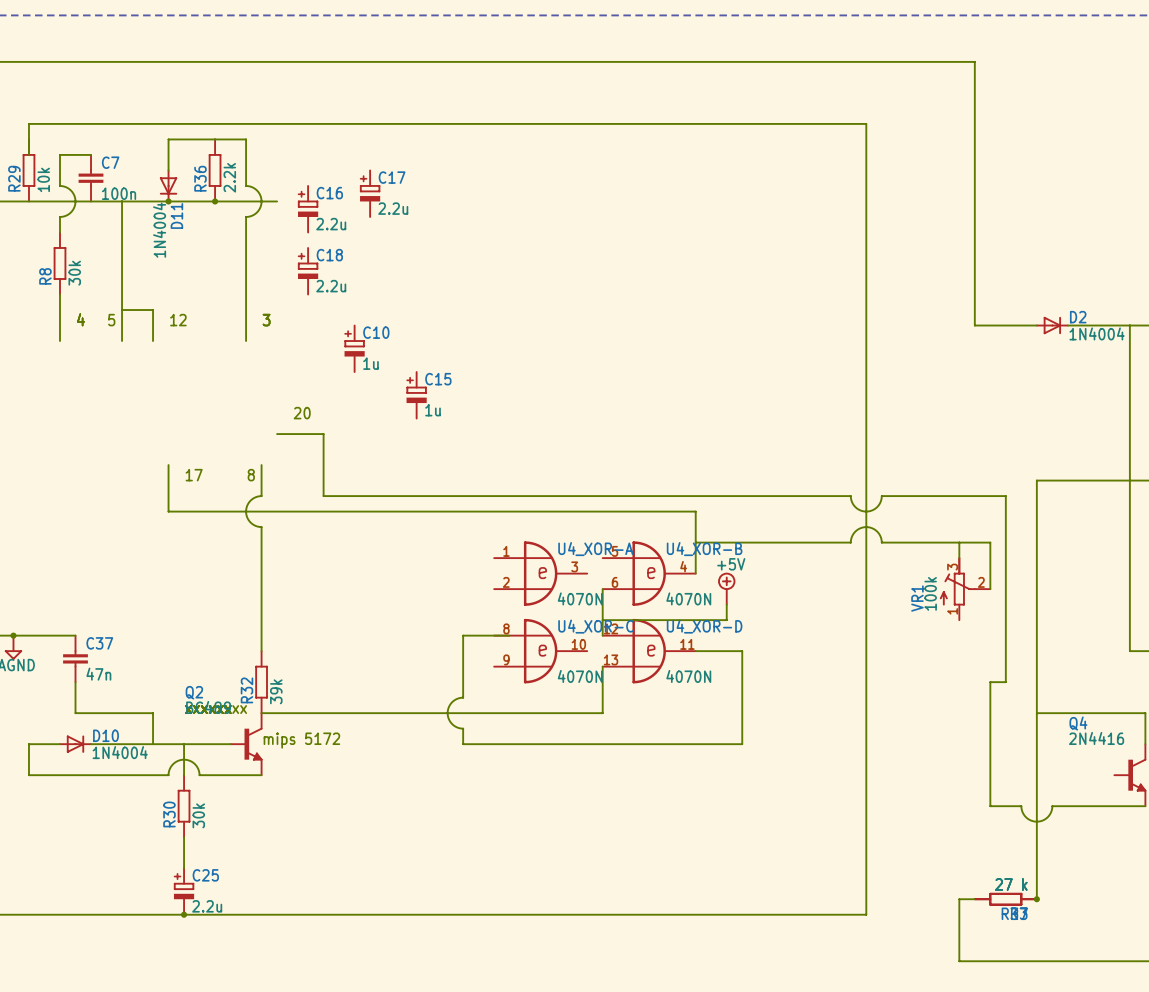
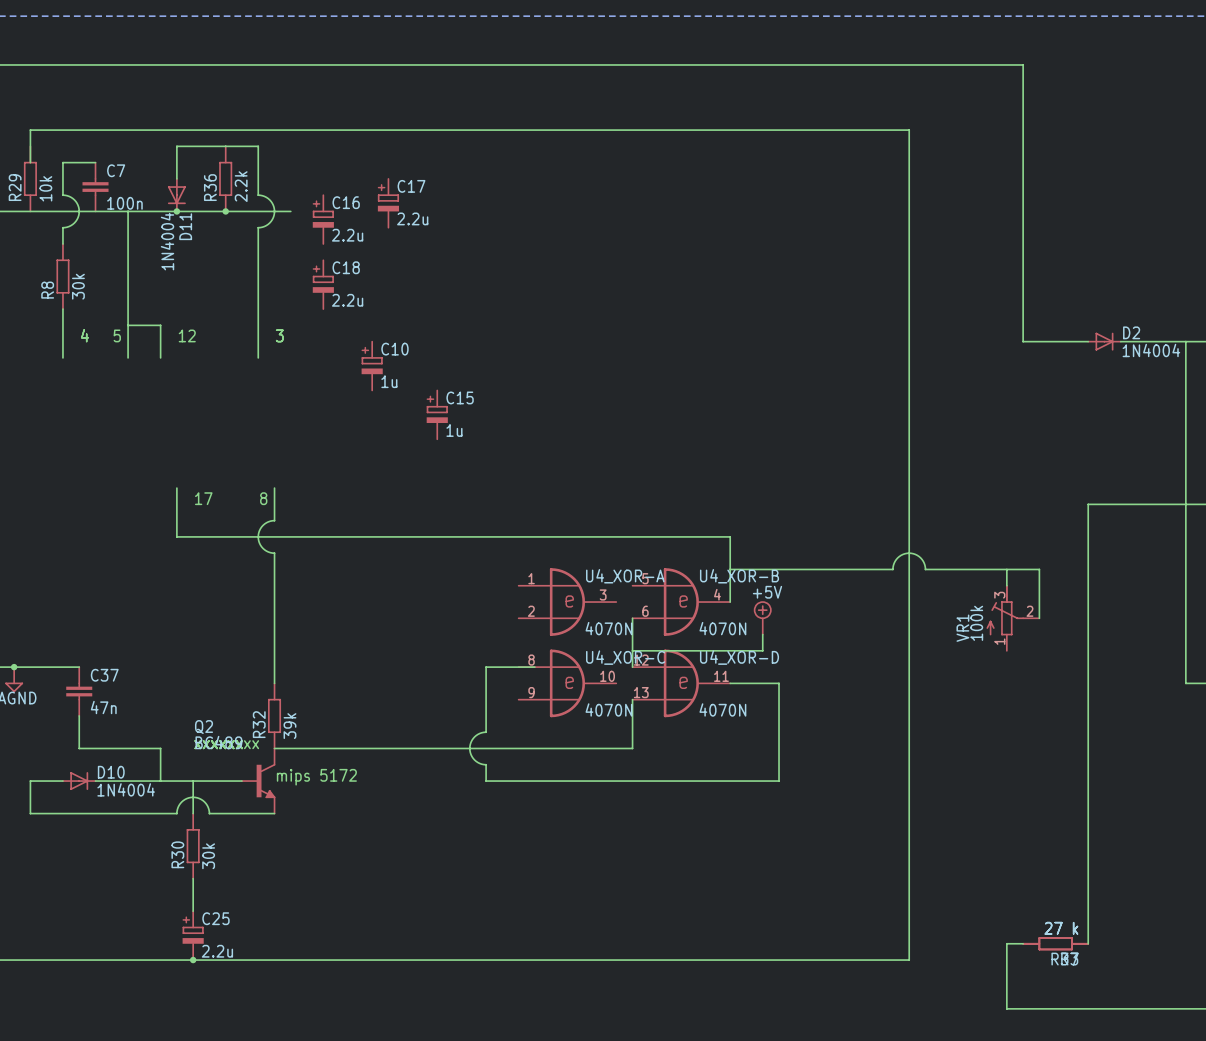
text: 20 (302, 413) -> none
wire: (277, 434) (323, 434) (323, 496) (850, 496) (855, 507) (866, 511) (877, 507) (881, 496) (1005, 496) (1005, 682) (990, 682) (990, 806) (1021, 806) (1025, 817) (1036, 821) (1047, 817) (1052, 806) (1145, 806) -> none
wire: (1036, 713) (1145, 713) (1145, 744) -> none
Q4: 2N4416 (1130, 775) -> none
junction: (1036, 899) -> none

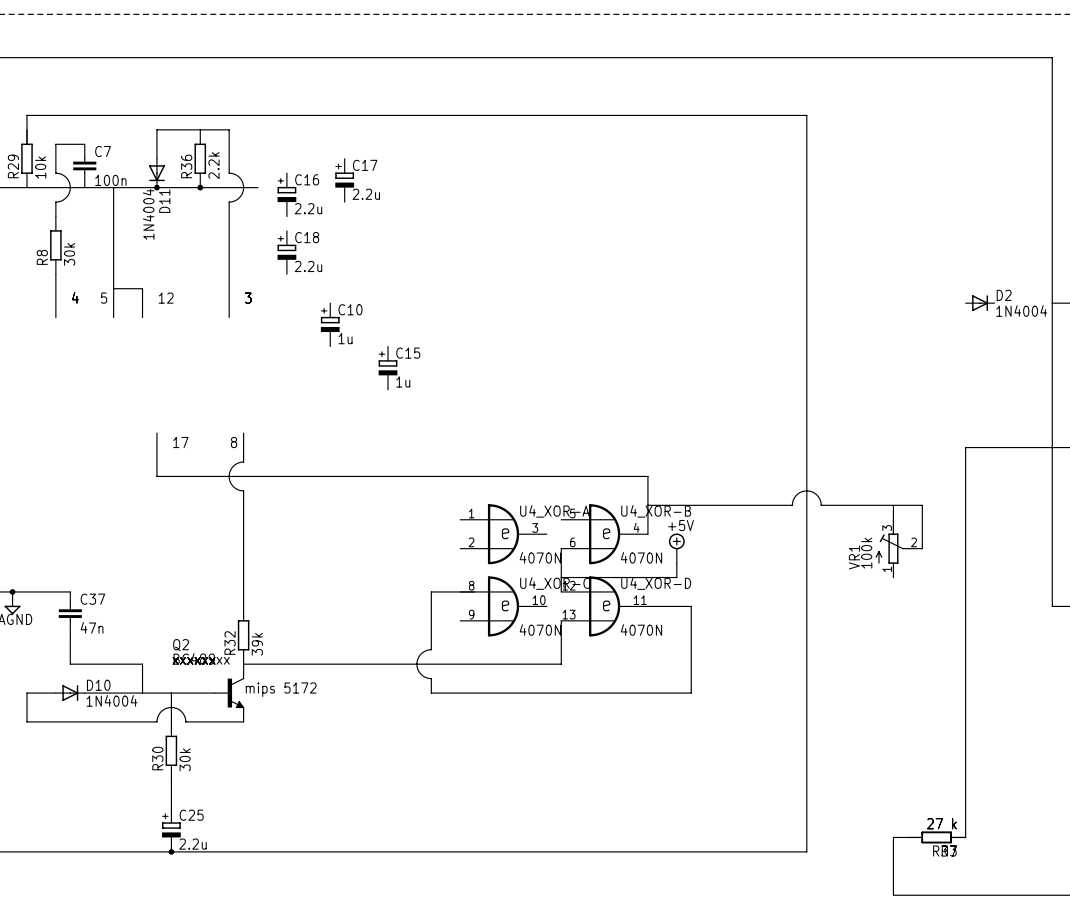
wire: (1023, 64) (1023, 341) (1088, 341) -> (907, 57) (1052, 57) (1052, 303)
wire: (1120, 341) (1185, 341) -> none

